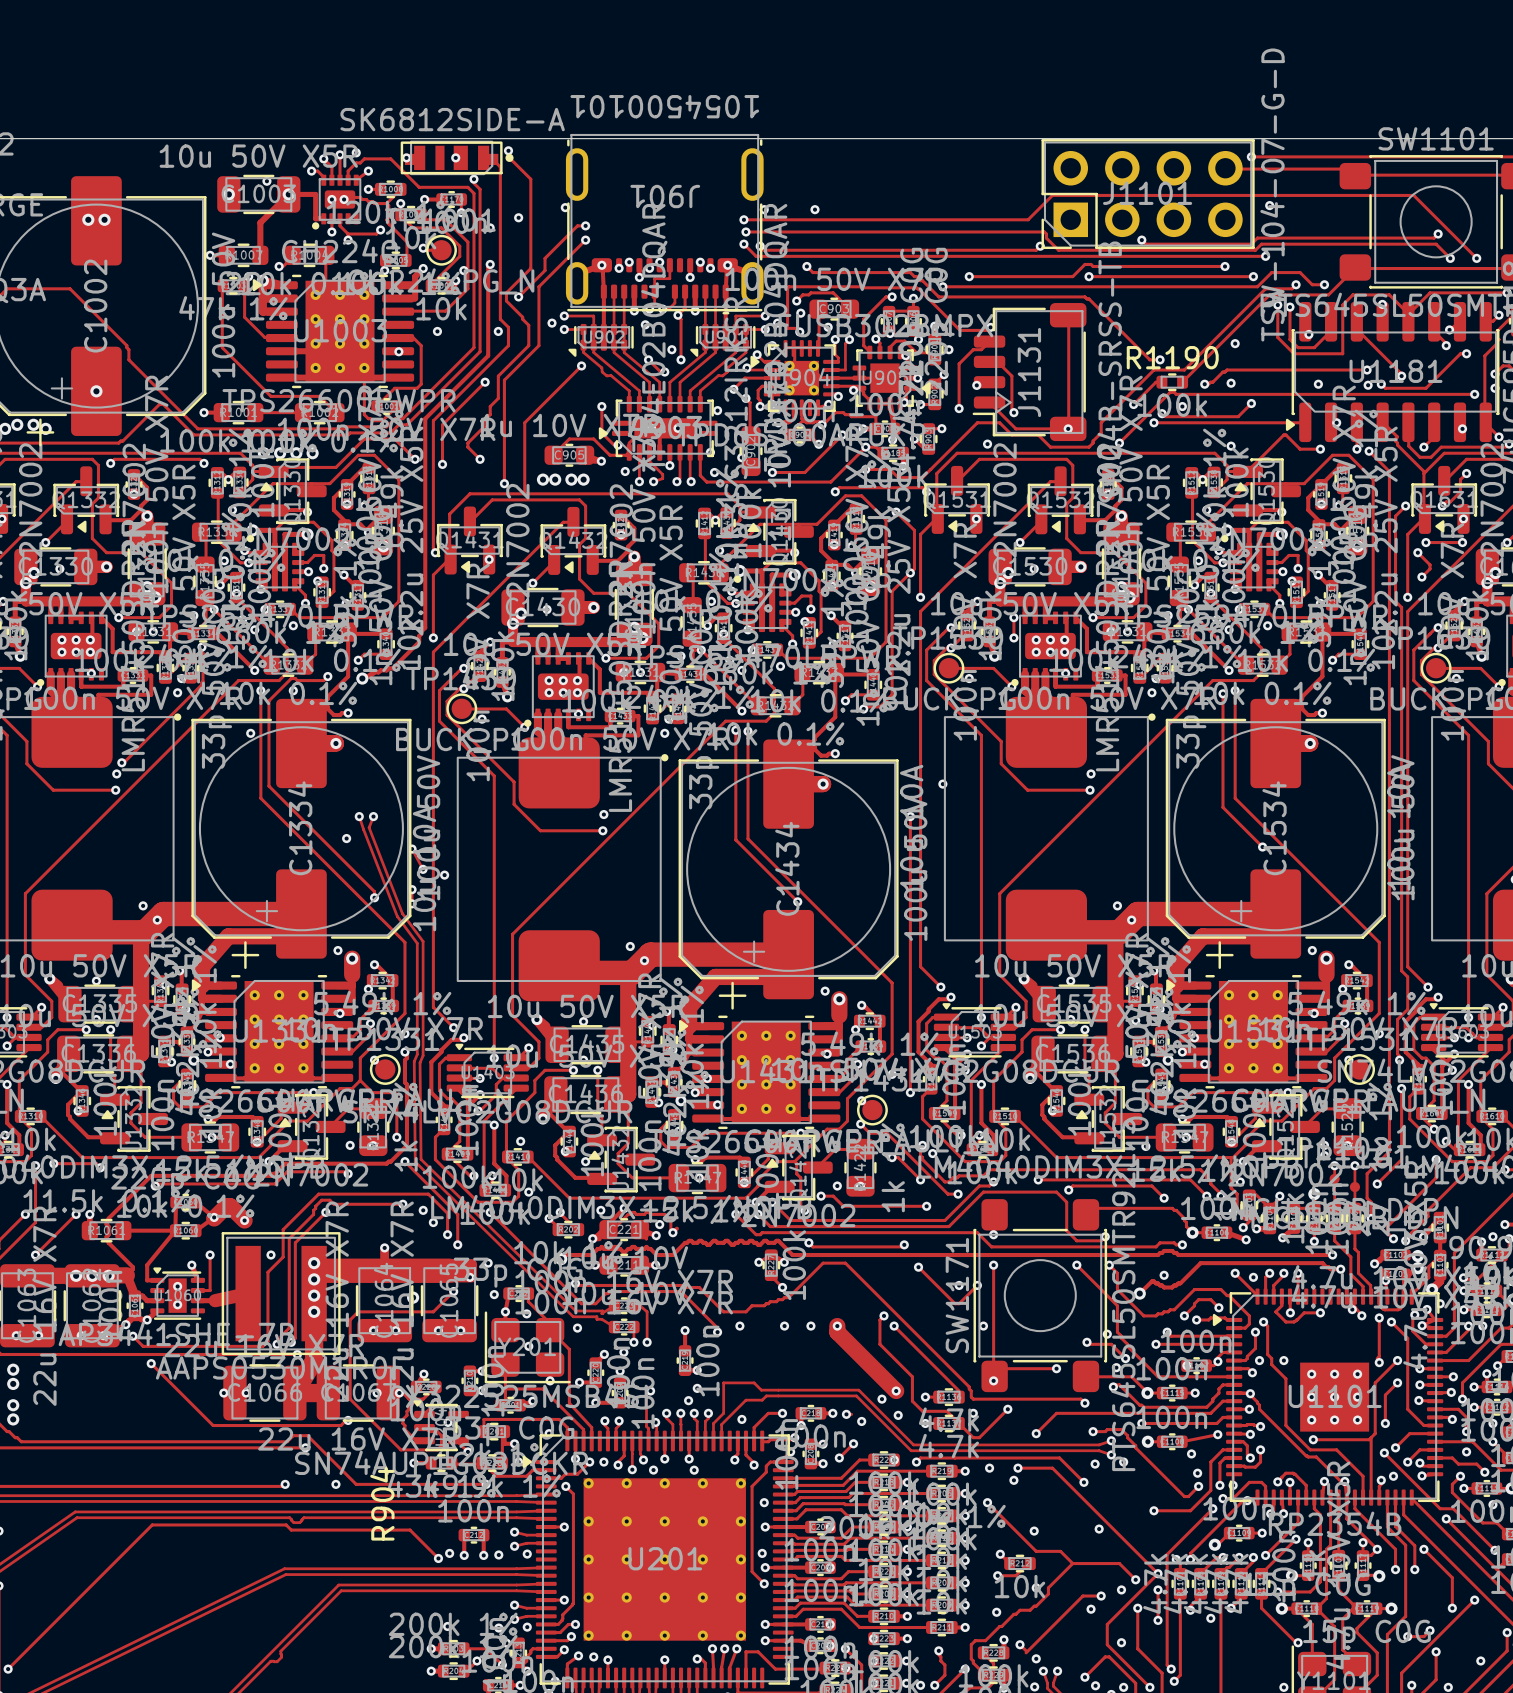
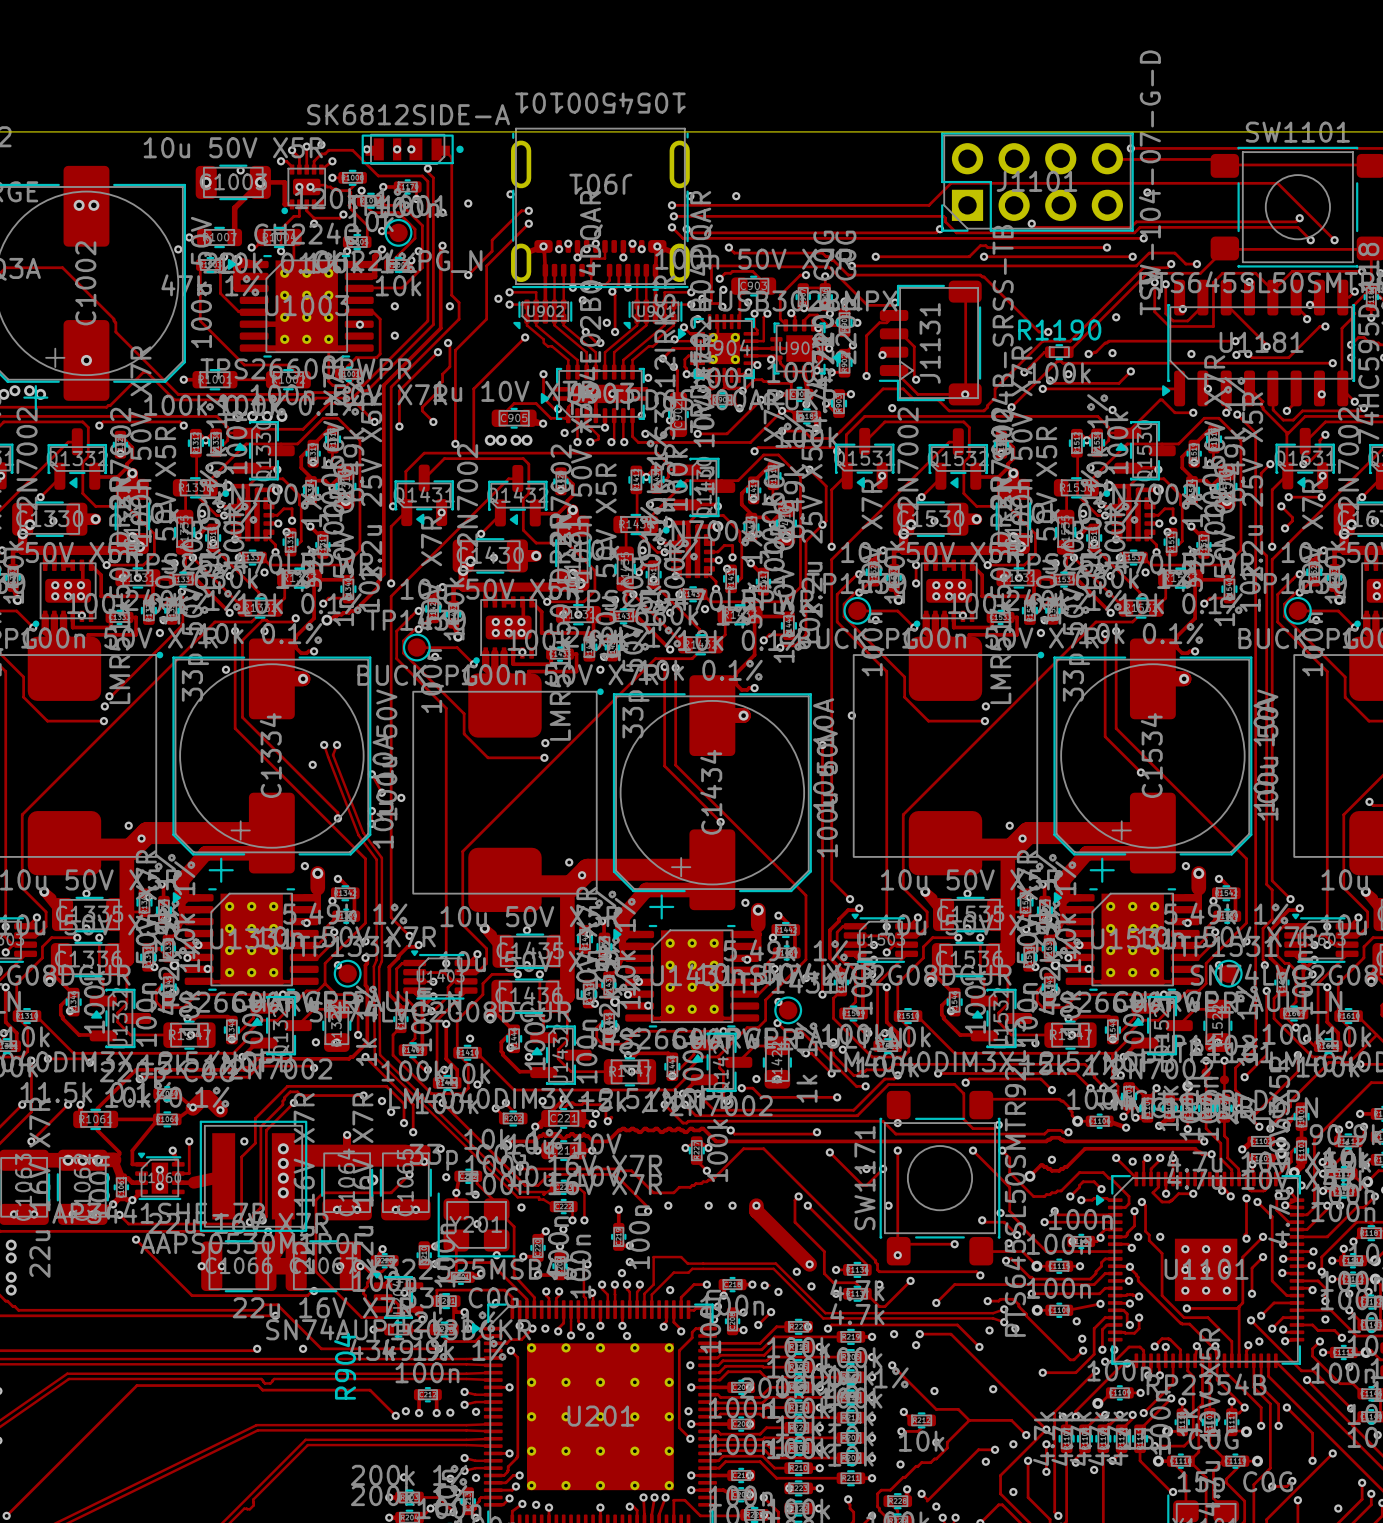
track: (508, 150) (508, 156) (530, 179) (530, 268) (506, 292) (506, 300) (528, 325) (528, 345) (498, 376) -> none
via: (508, 150) -> none
via: none -> (397, 149)
track: none -> (299, 216) (293, 216) (281, 229) (281, 251)
via position: (331, 231) -> (281, 251)
via: none -> (178, 249)
via: none -> (394, 335)
via: none -> (448, 343)

